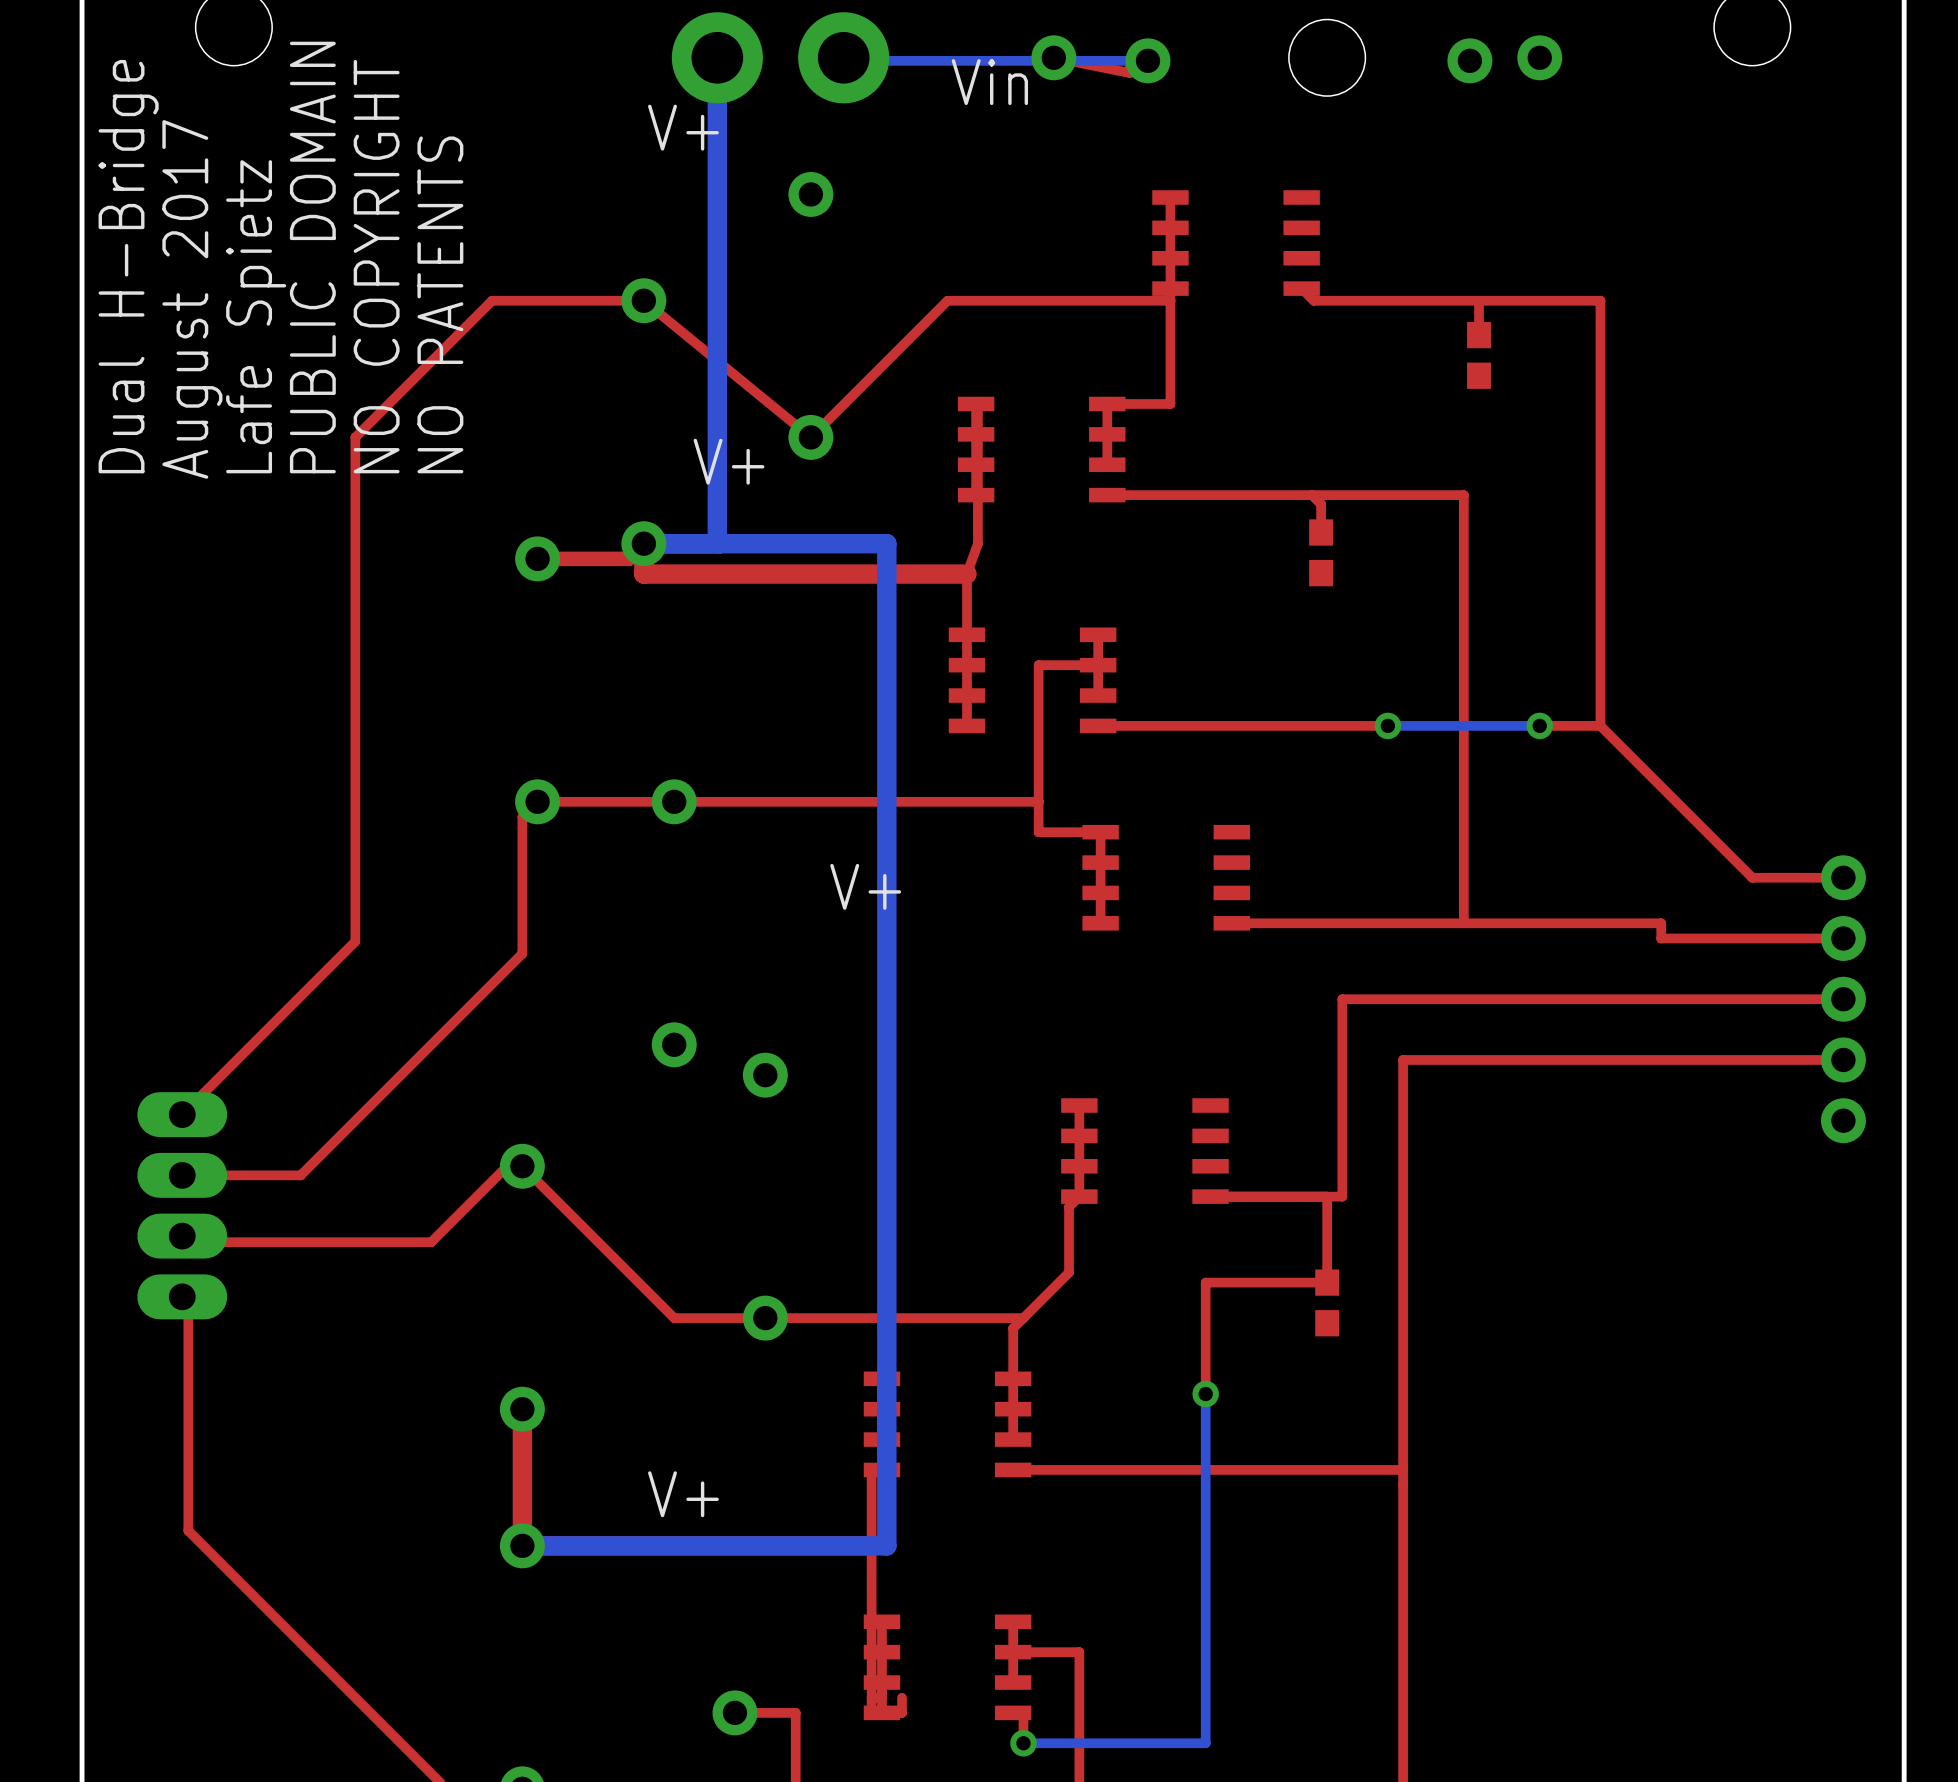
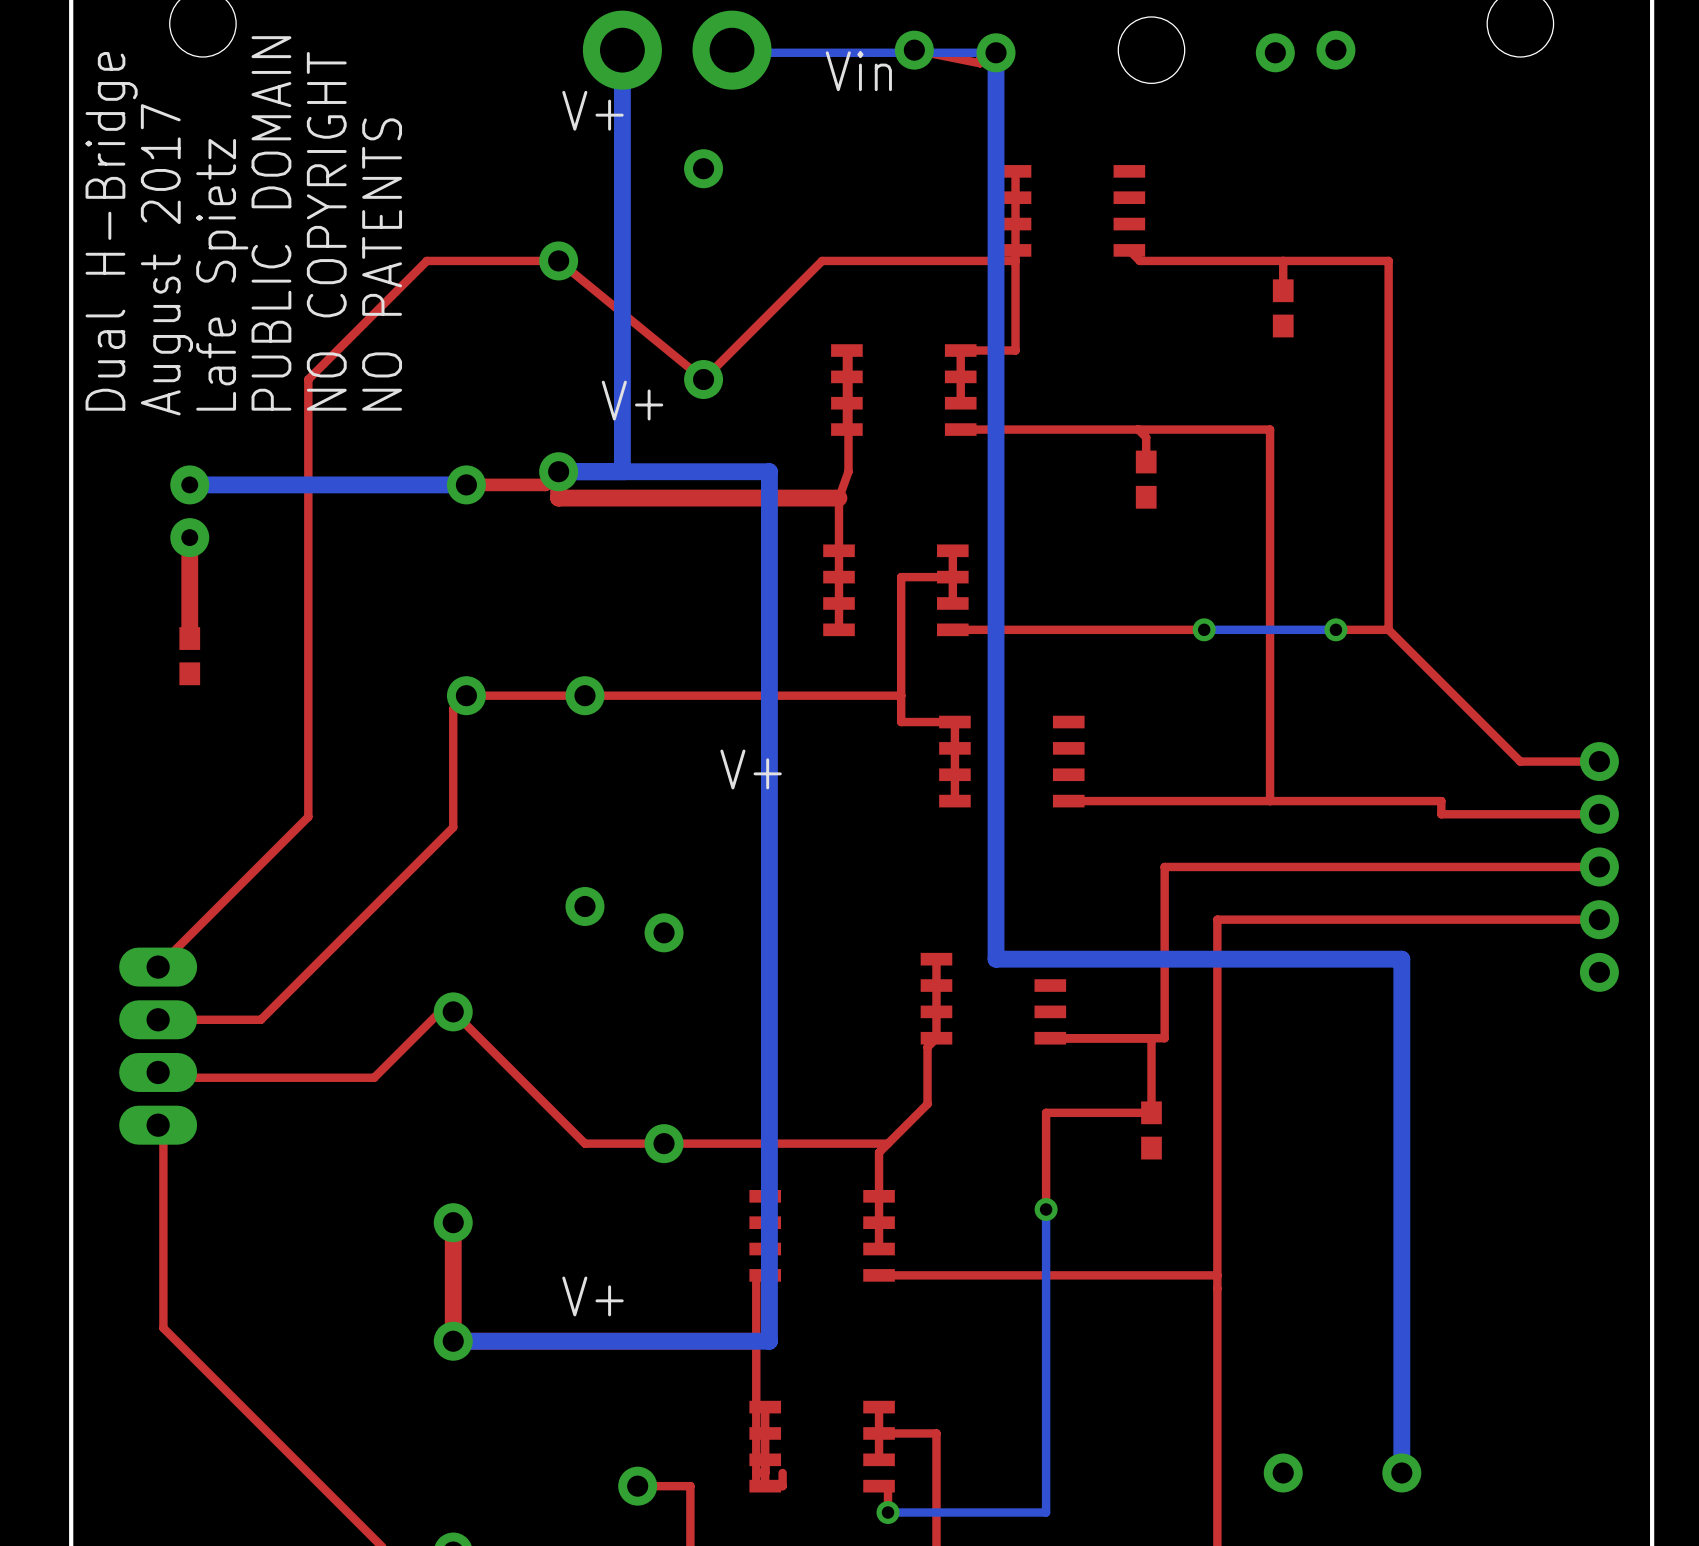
bottom track: none -> (996, 52) (996, 959) (1401, 959) (1401, 1472)
bottom track: none -> (466, 484) (189, 484)
part: none -> (189, 511)
top track: none -> (189, 537) (189, 638)
part: none -> (189, 656)
part: none -> (1283, 1472)
part: none -> (1401, 1472)

